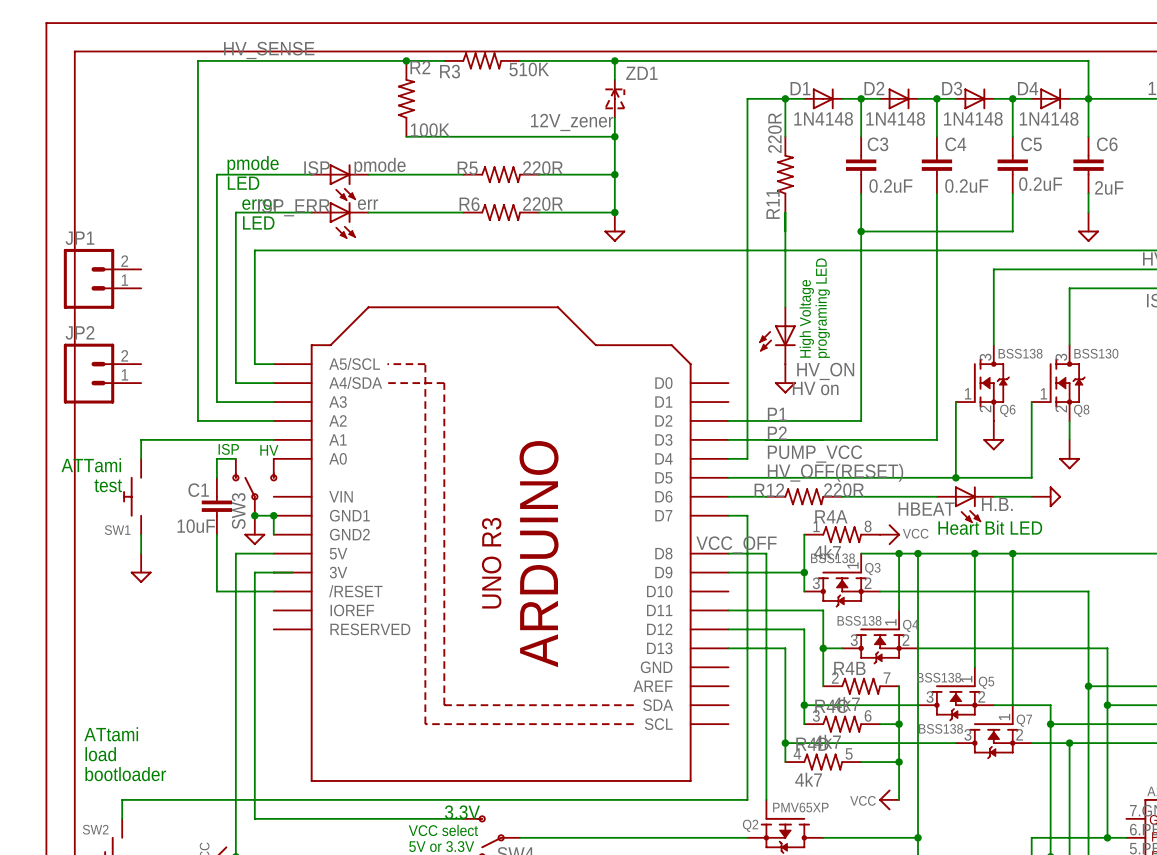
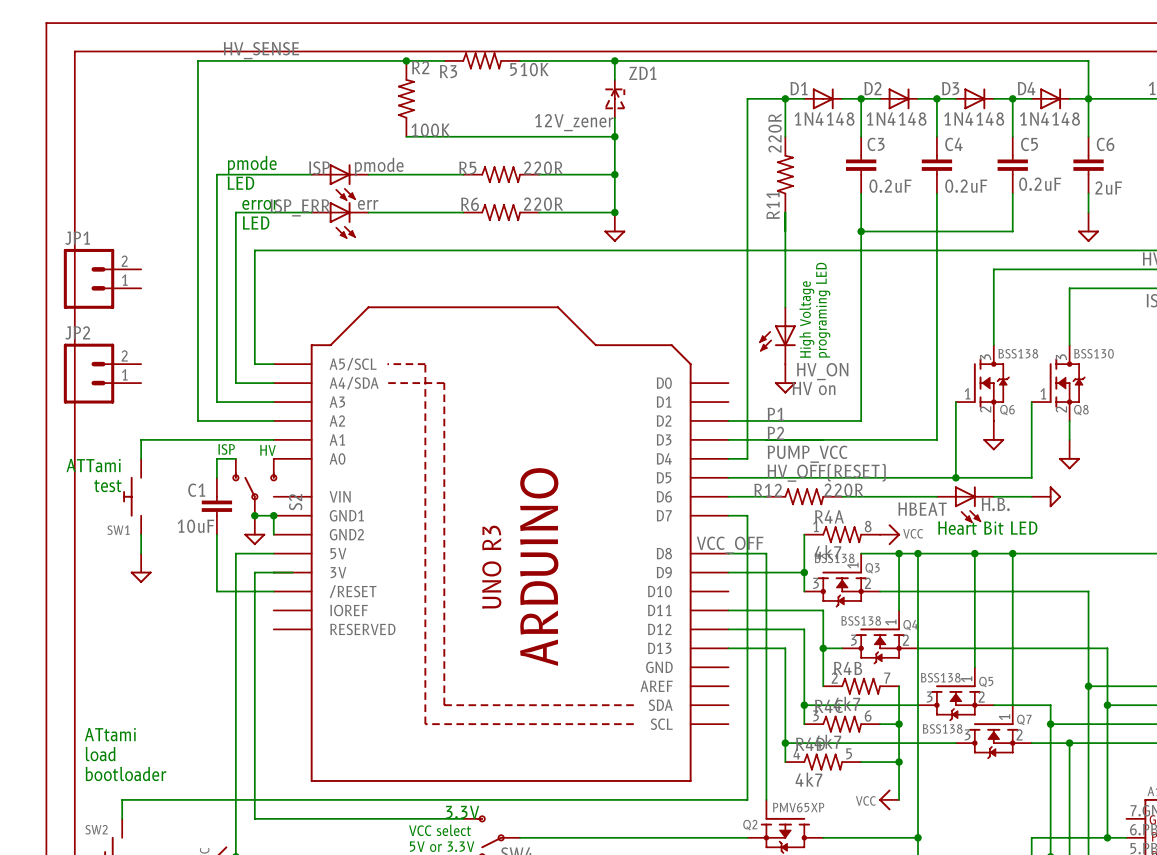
SW3 name: SW3 (238, 511) -> S2 (295, 502)

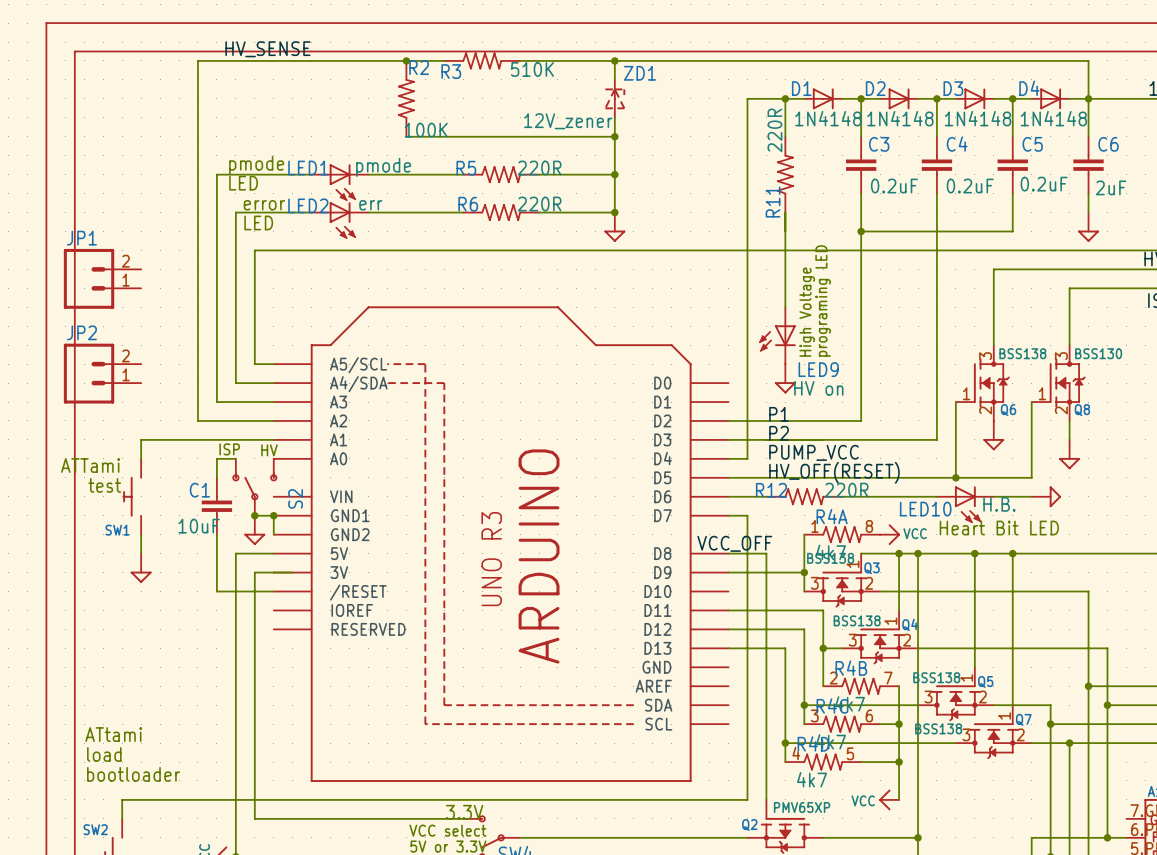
ISP name: ISP (319, 168) -> LED1 (308, 168)
ISP_ERR name: ISP_ERR (300, 207) -> LED2 (308, 205)
HV_ON name: HV_ON (822, 371) -> LED9 (818, 369)
HBEAT name: HBEAT (922, 509) -> LED10 (925, 509)

